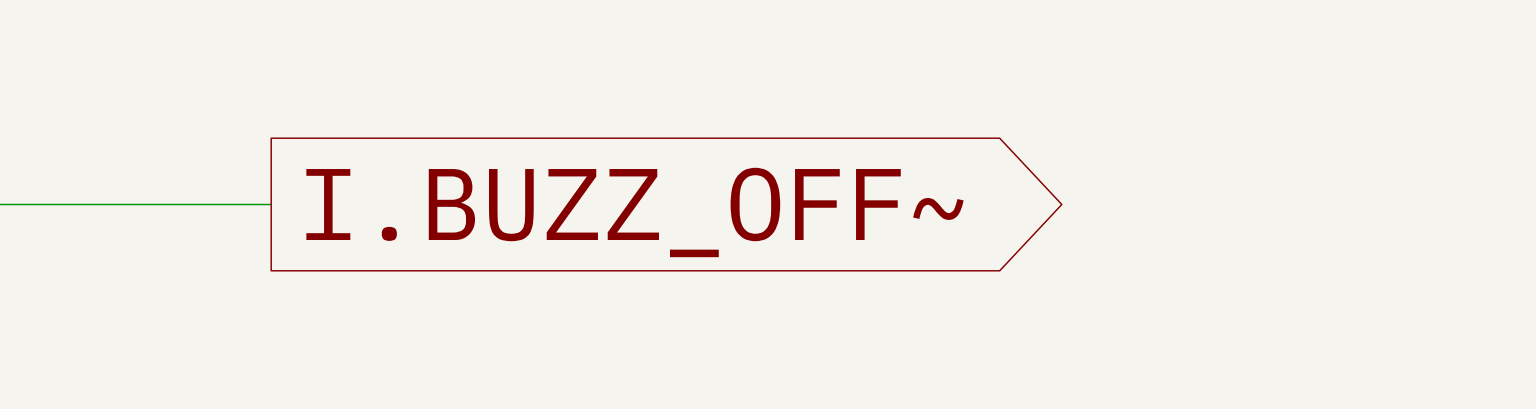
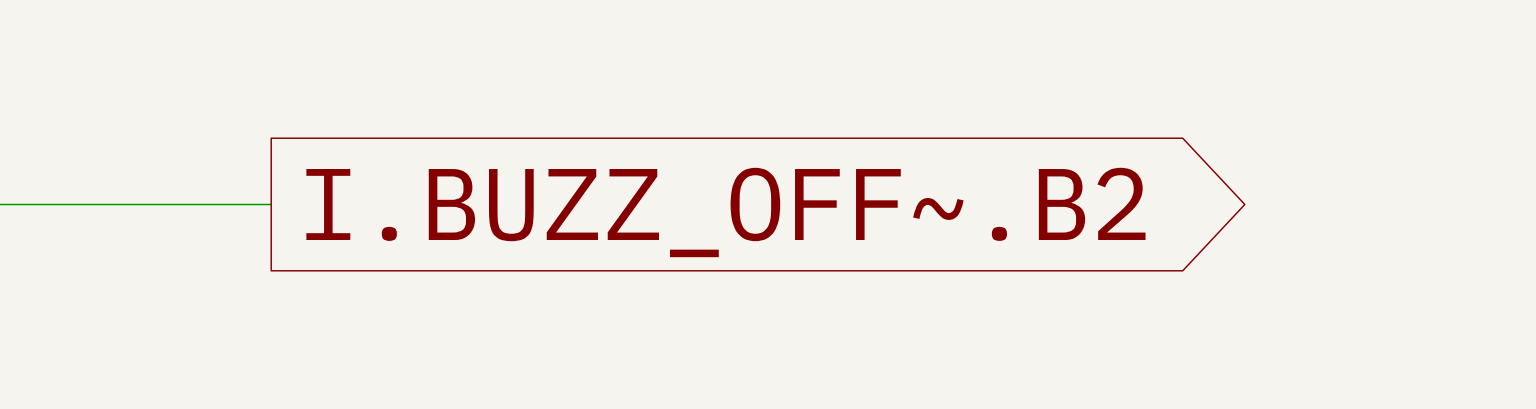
global label: I.BUZZ_OFF~ (634, 212) -> I.BUZZ_OFF~.B2 (725, 212)

